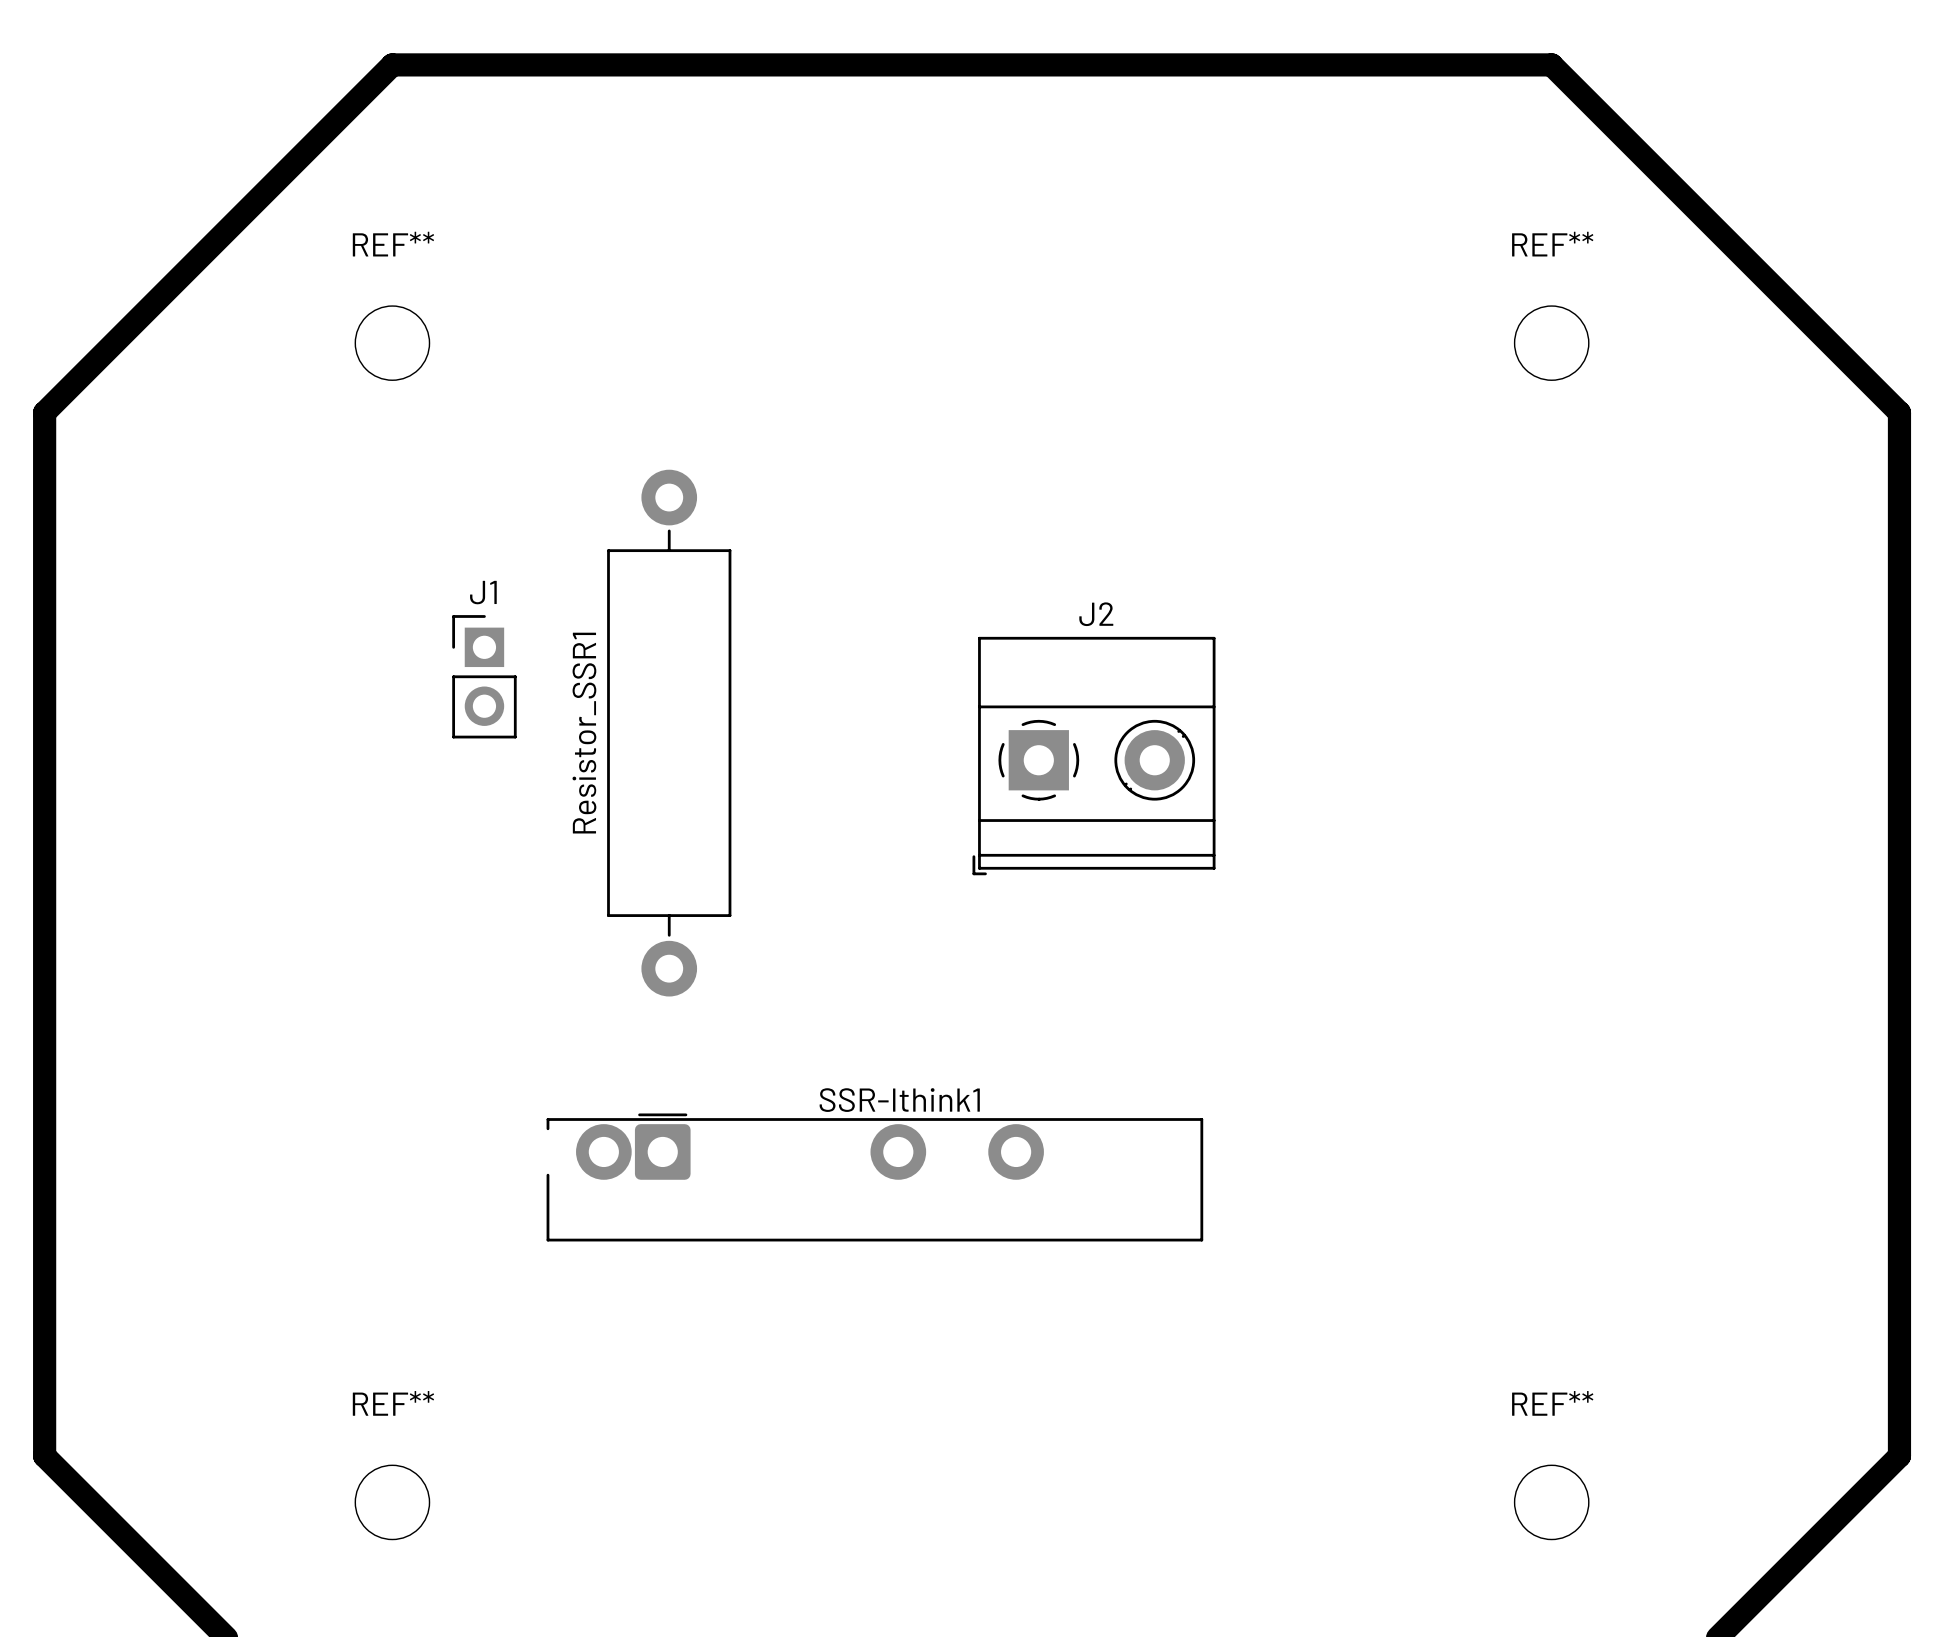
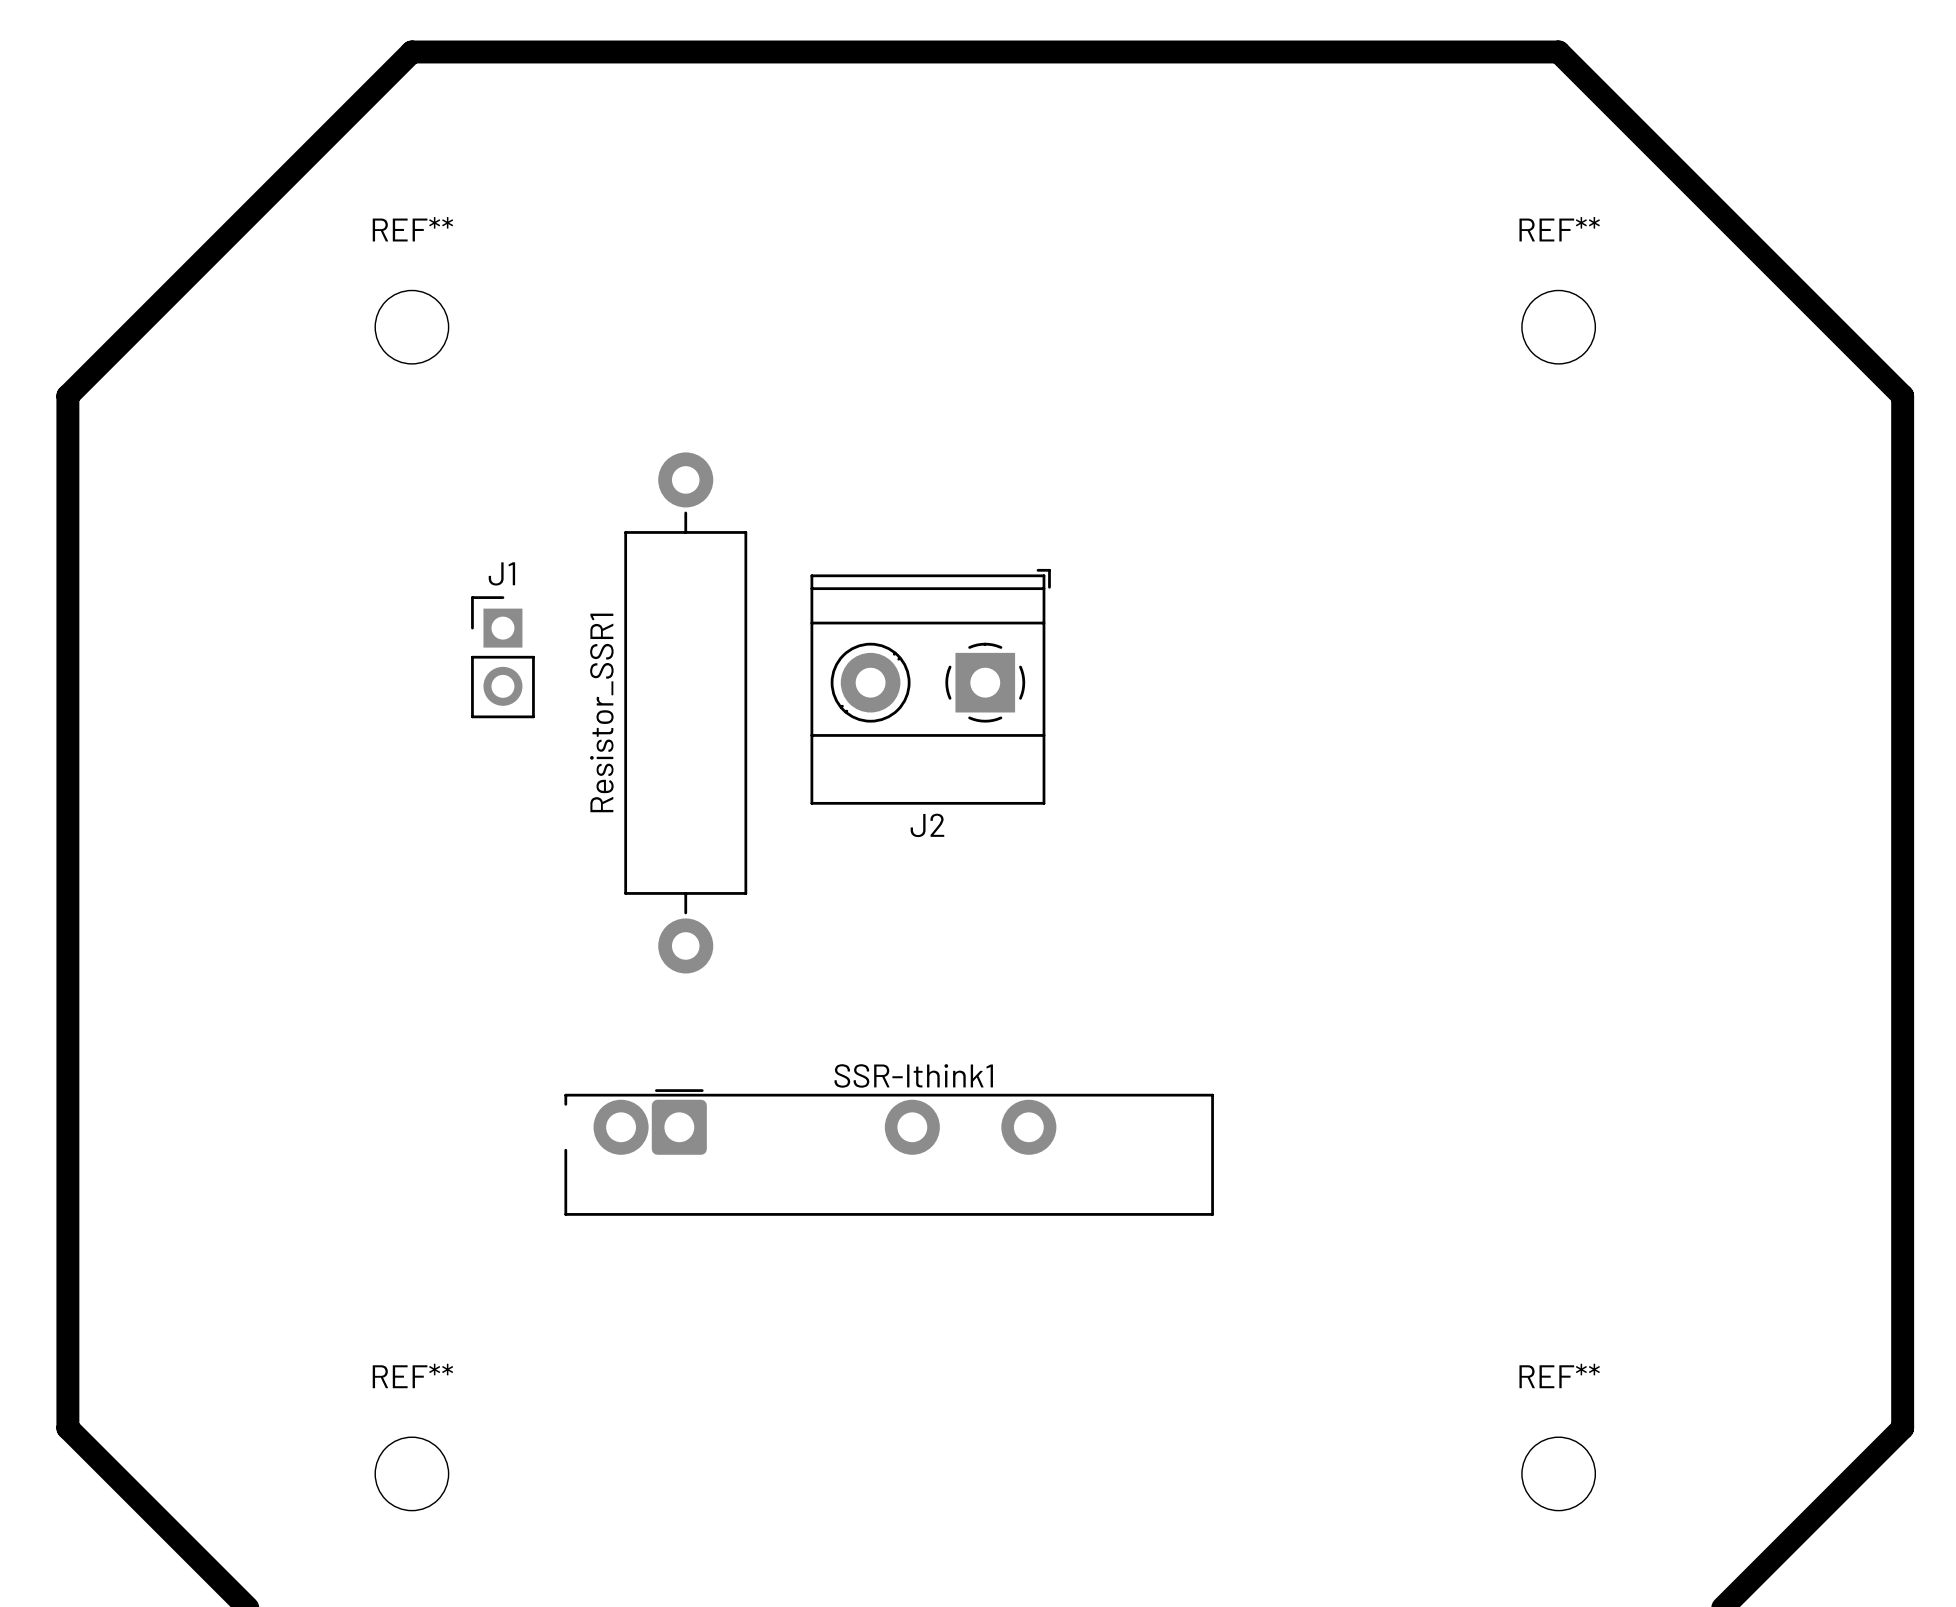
J2 rotation: 0° (1094, 756) -> 180° (930, 686)
J2 position: (1094, 756) -> (930, 686)

